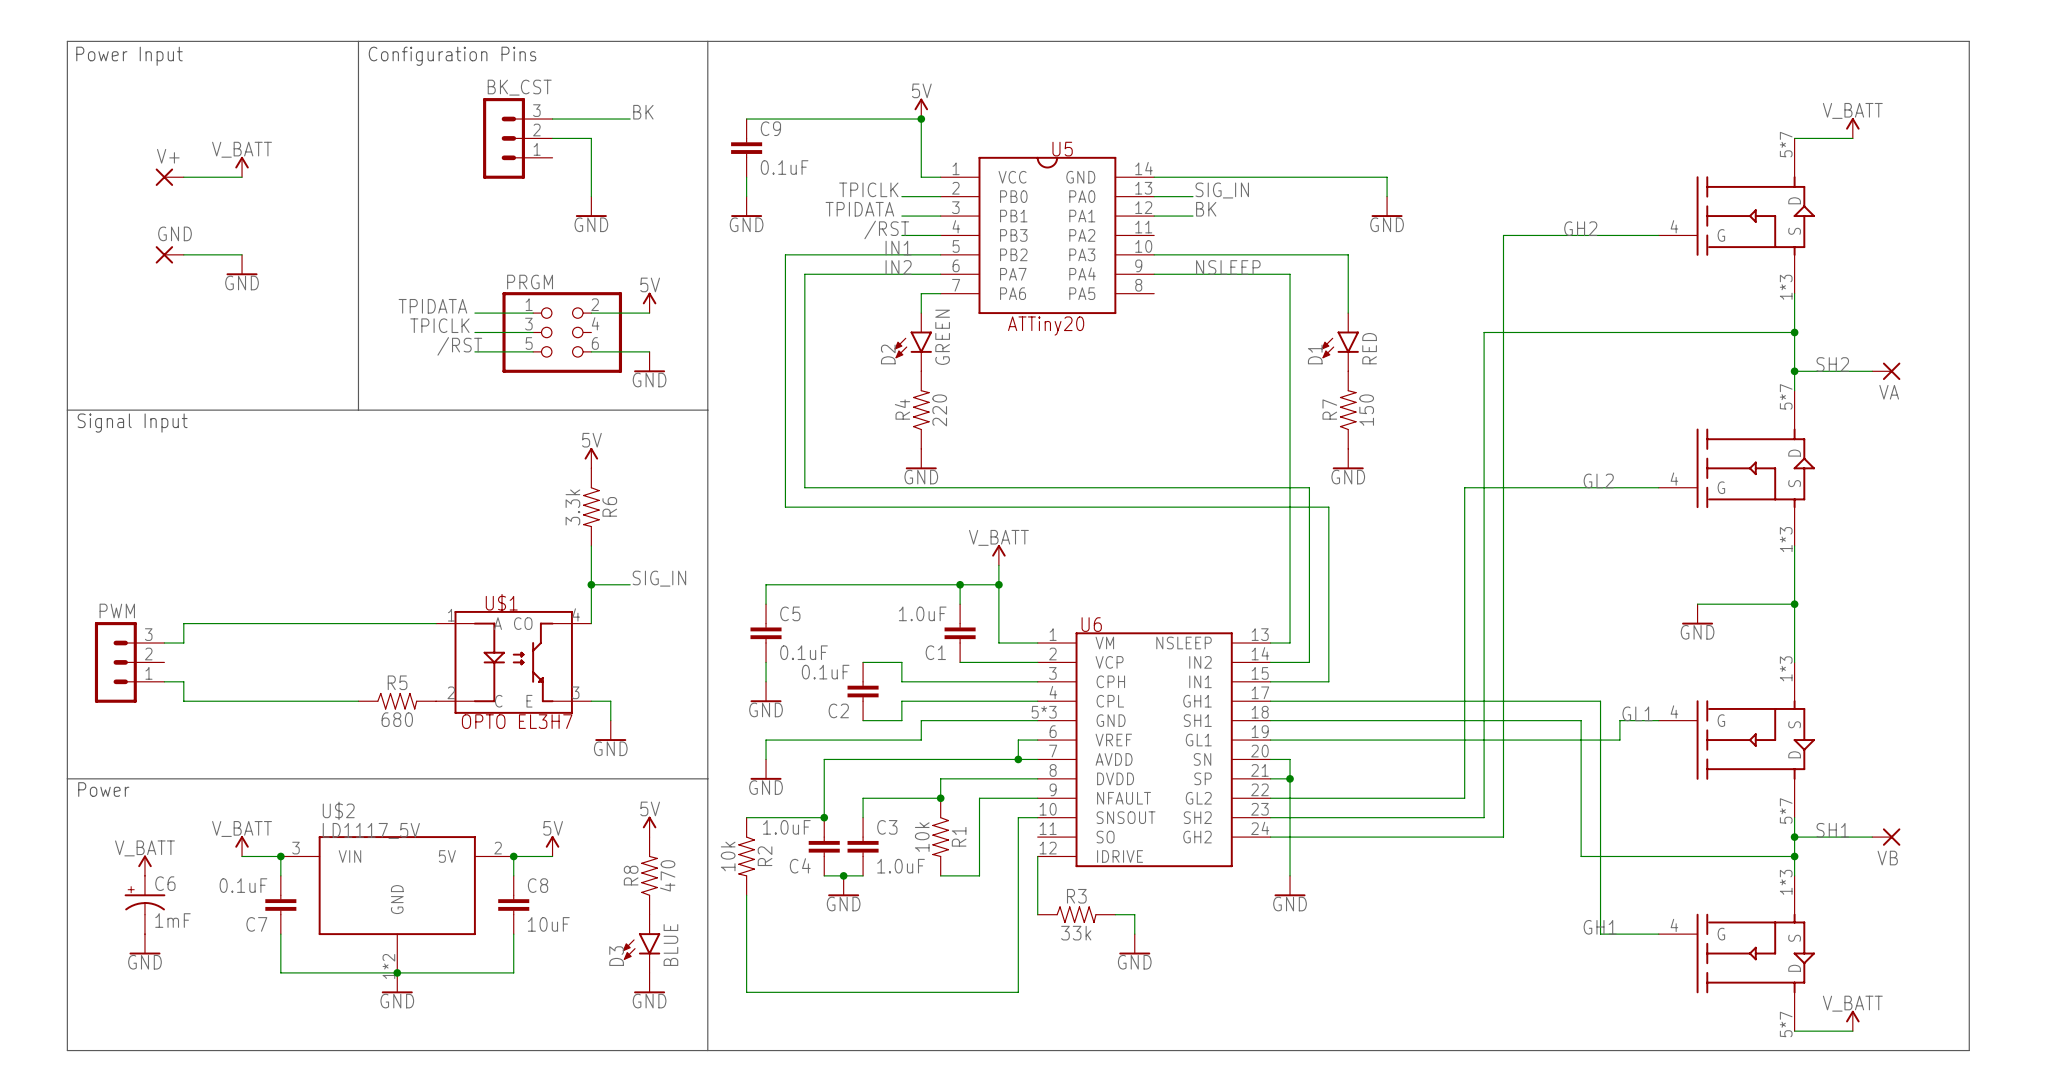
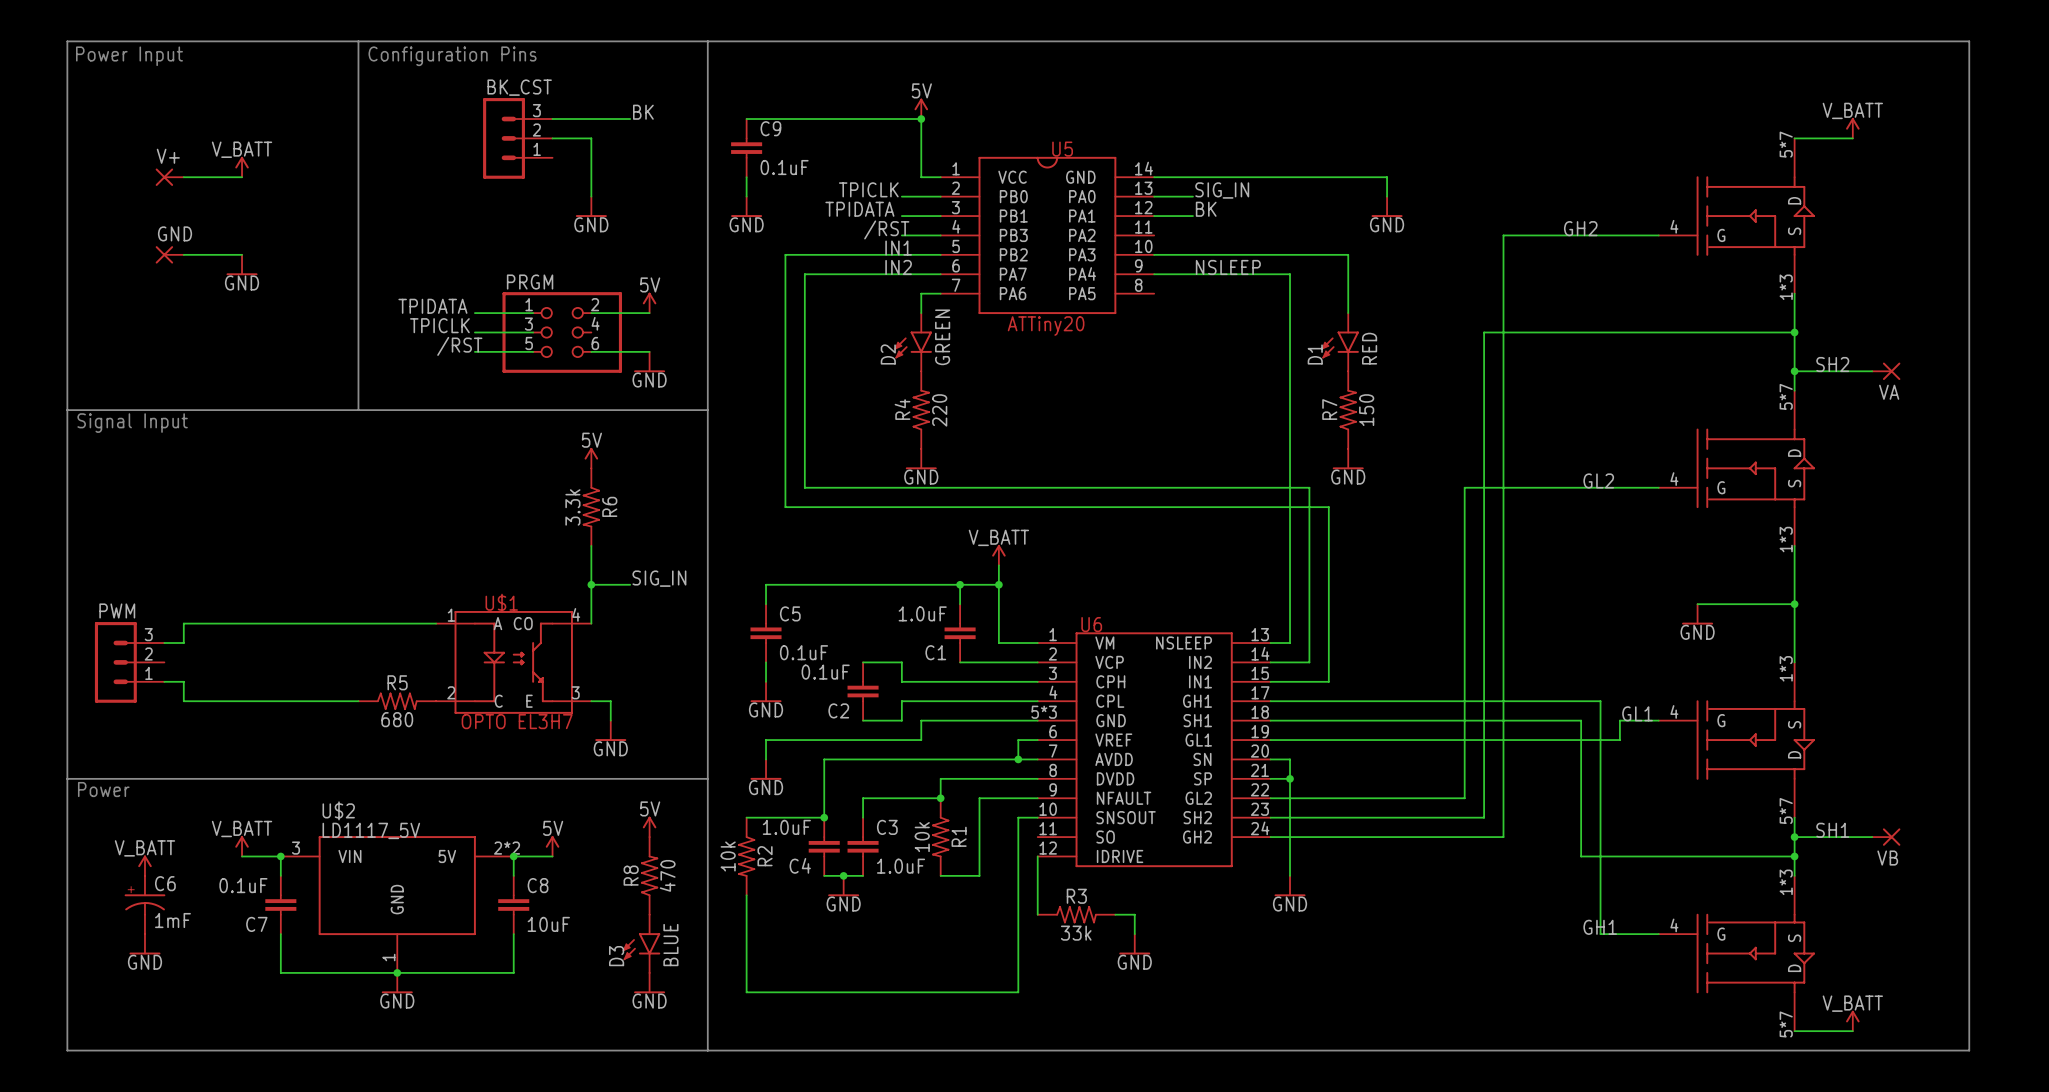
U$2 pin number: 2 (498, 848) -> 2*2 (507, 848)
U$2 pin number: 1*2 (388, 966) -> 1 (388, 957)

